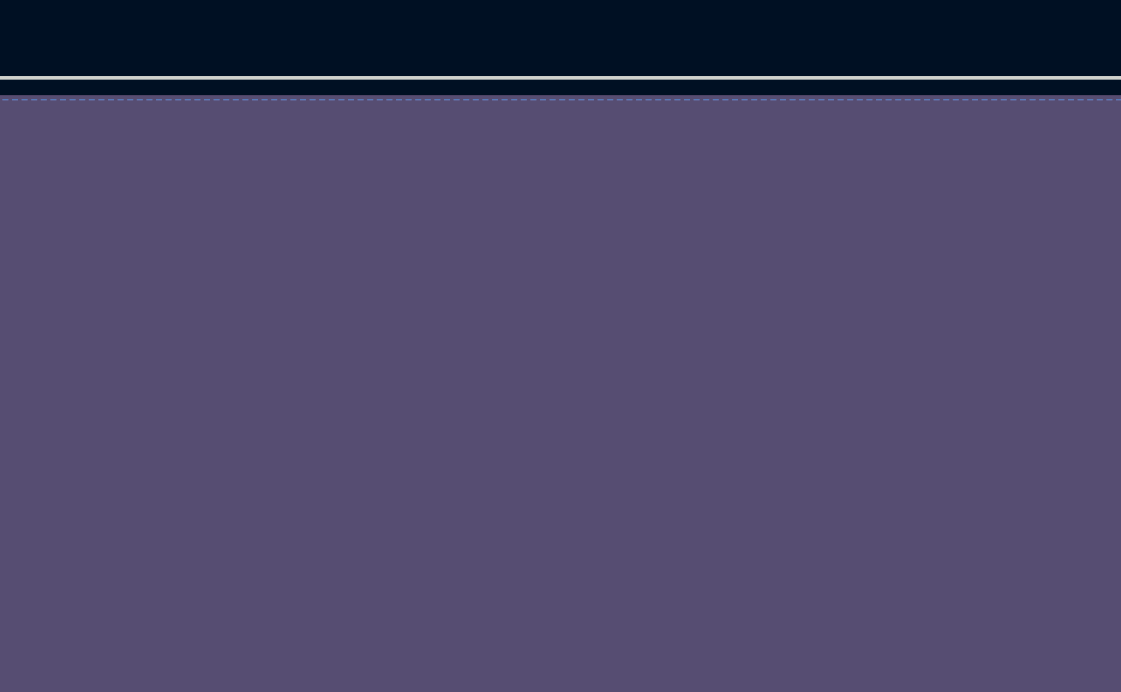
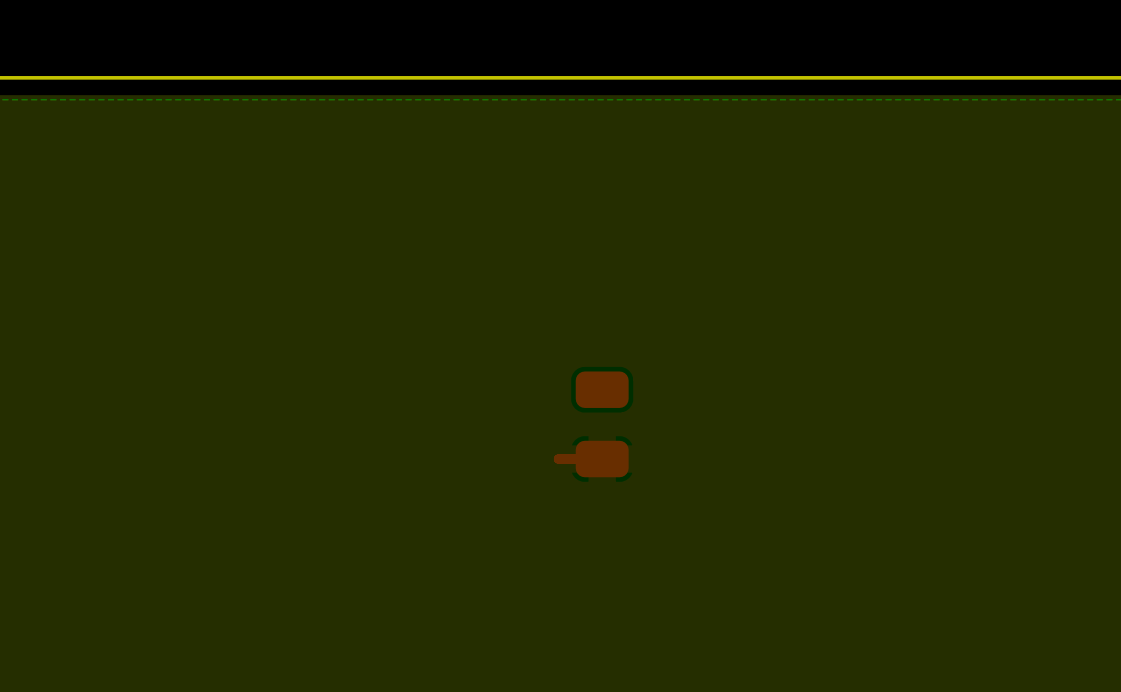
part: none -> (602, 424)
top track: none -> (602, 459) (558, 459)

